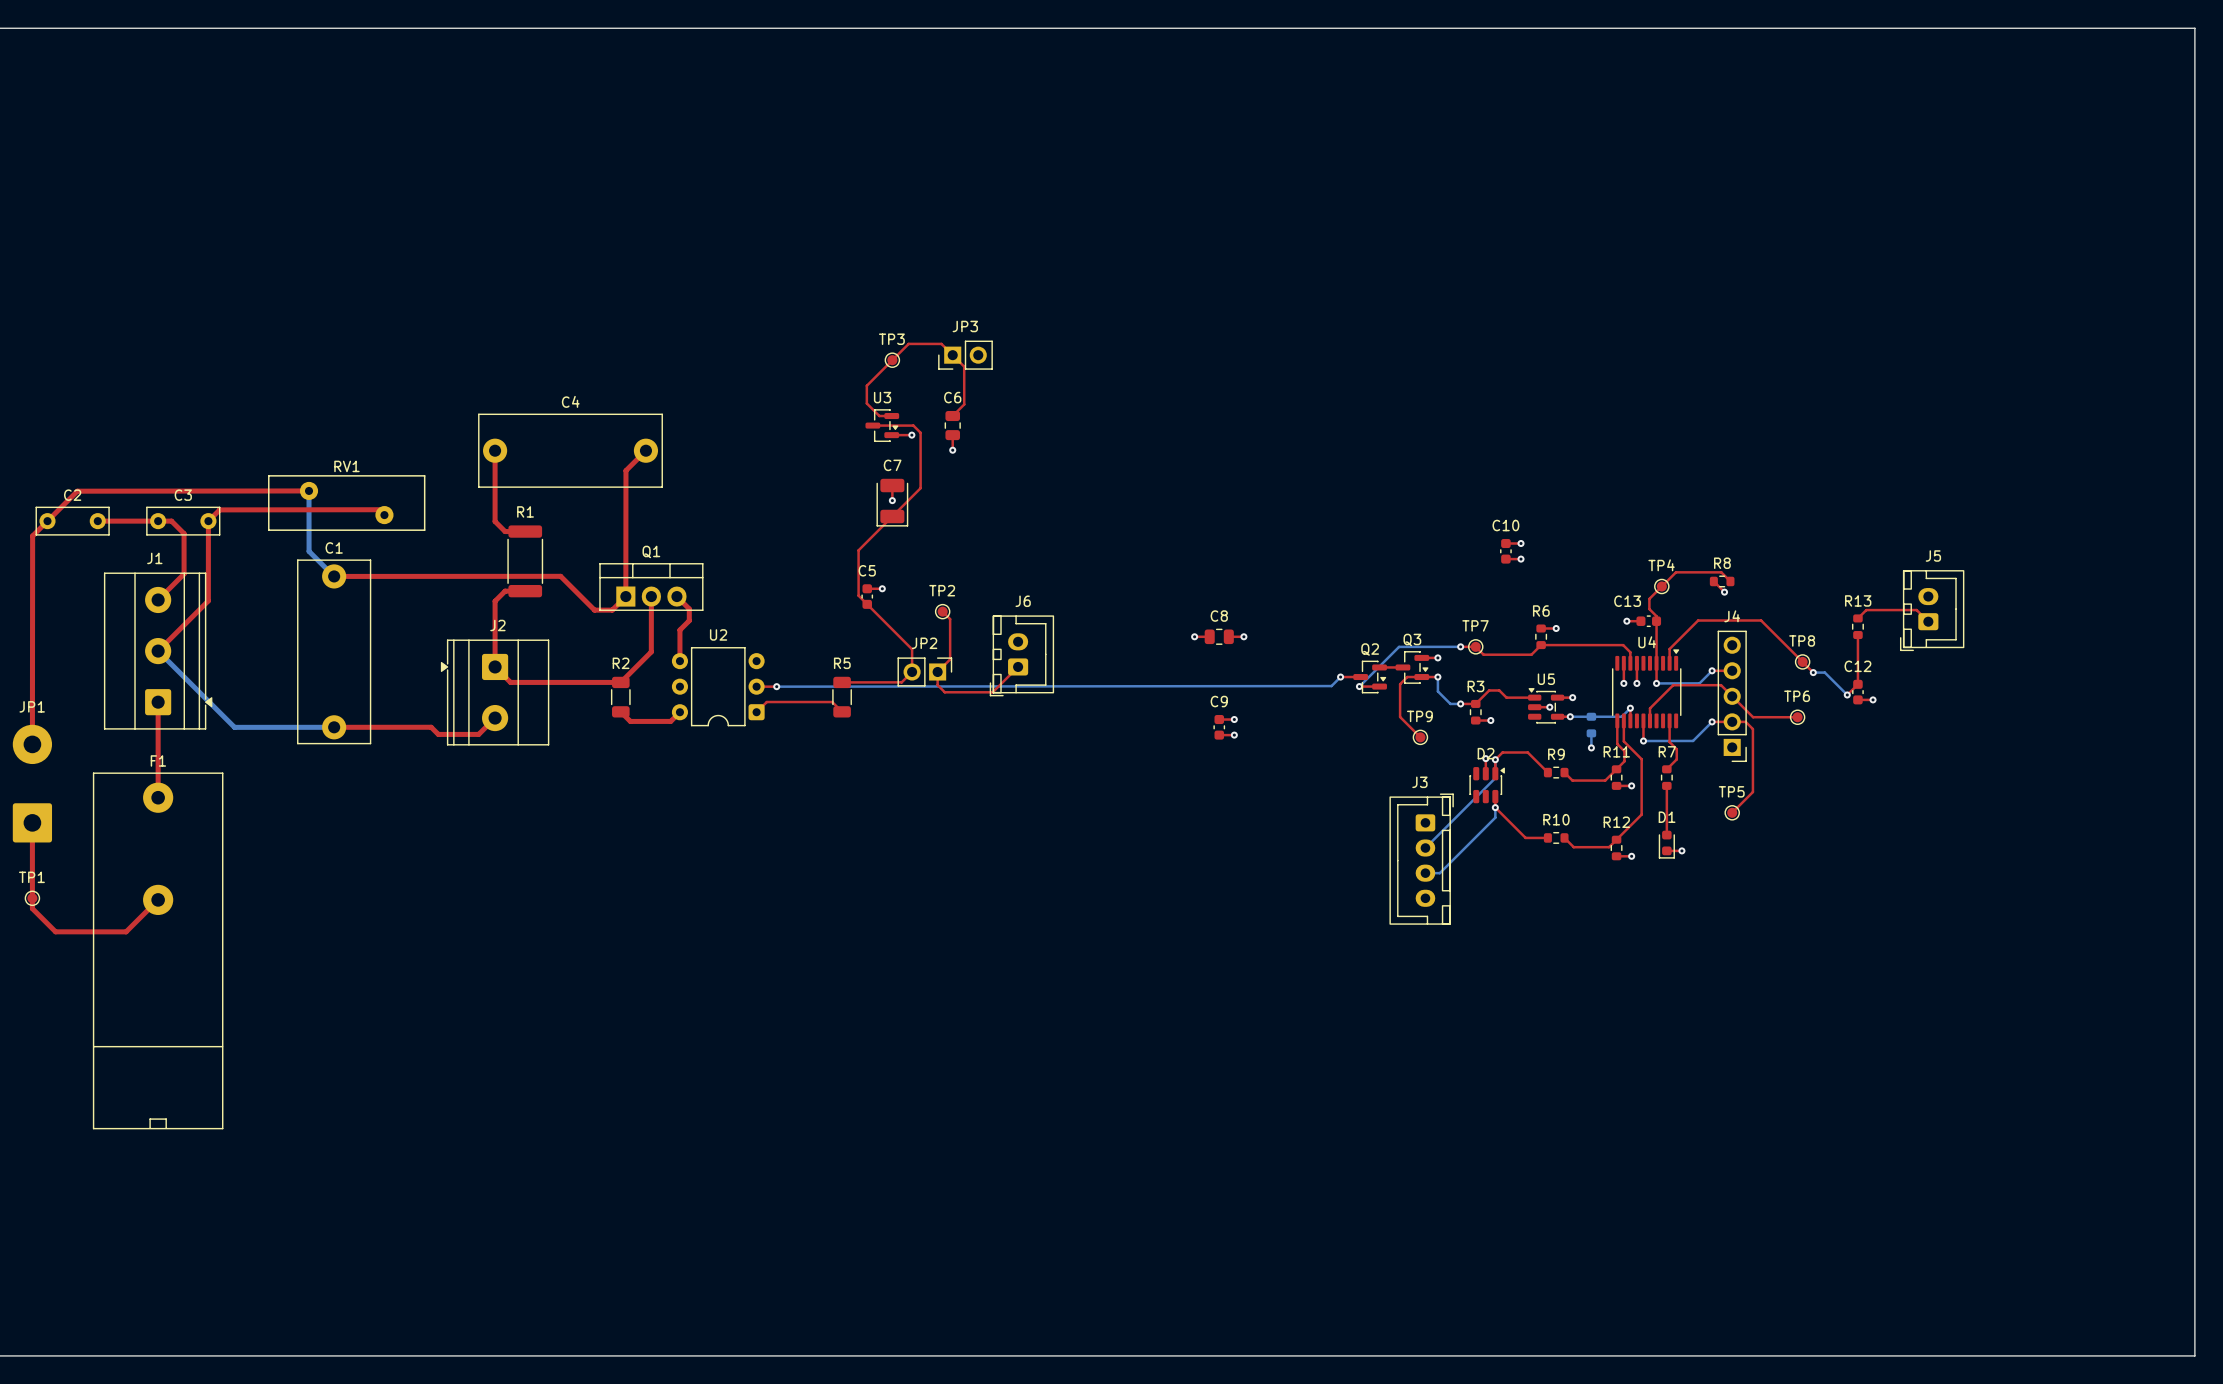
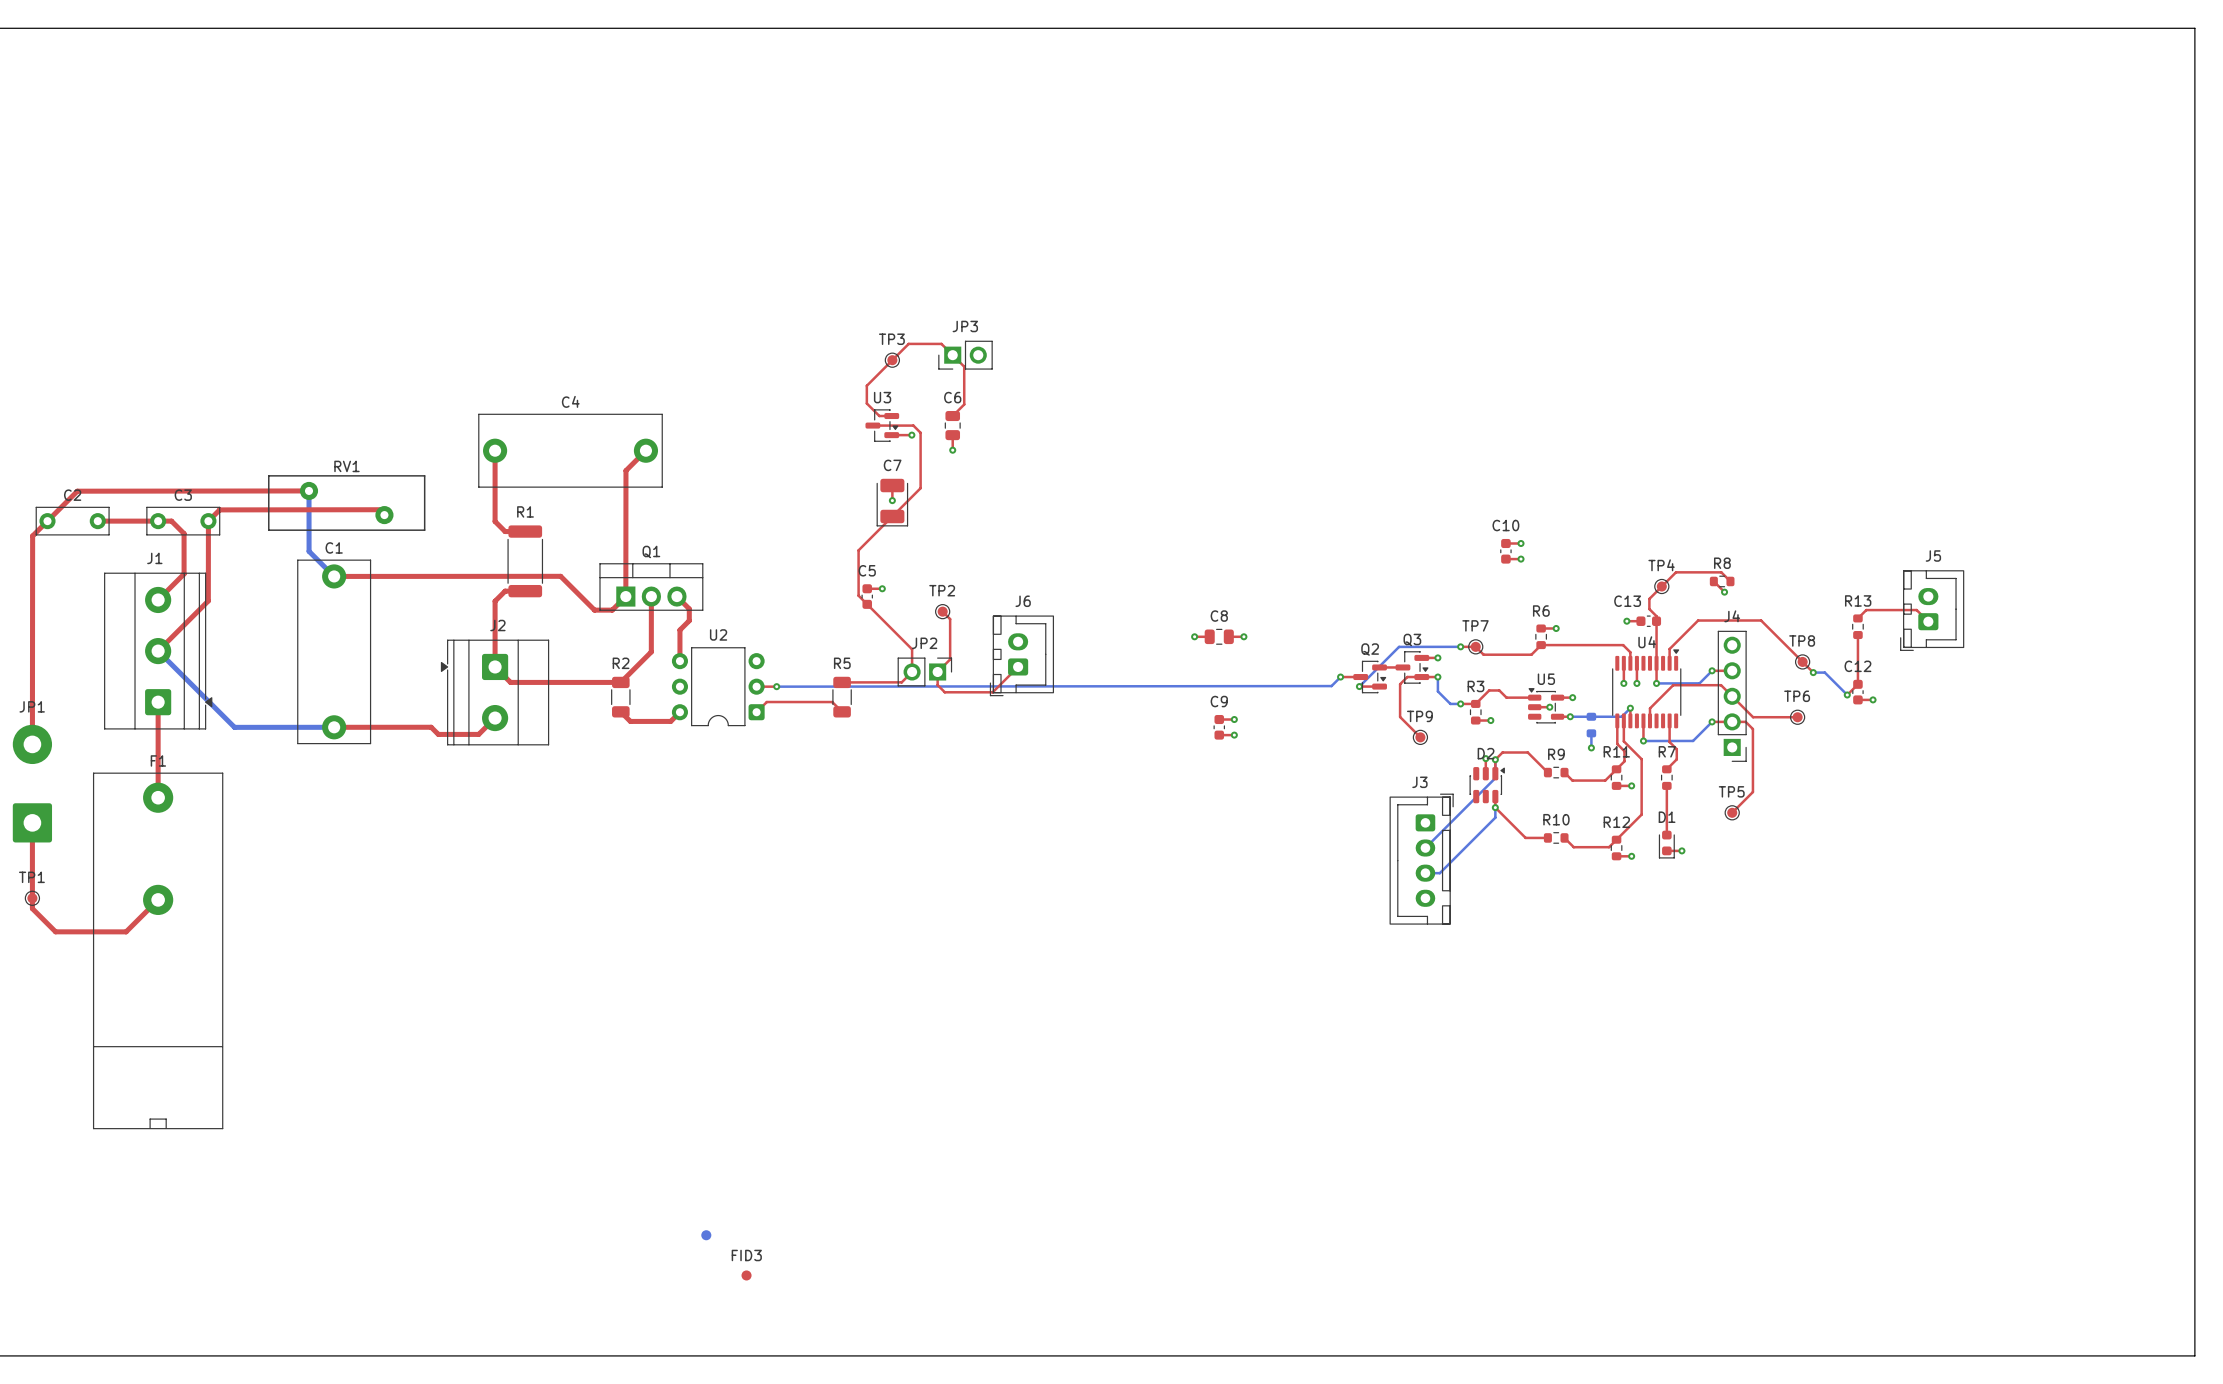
part: none -> (706, 1235)
FID3: none -> (746, 1275)

